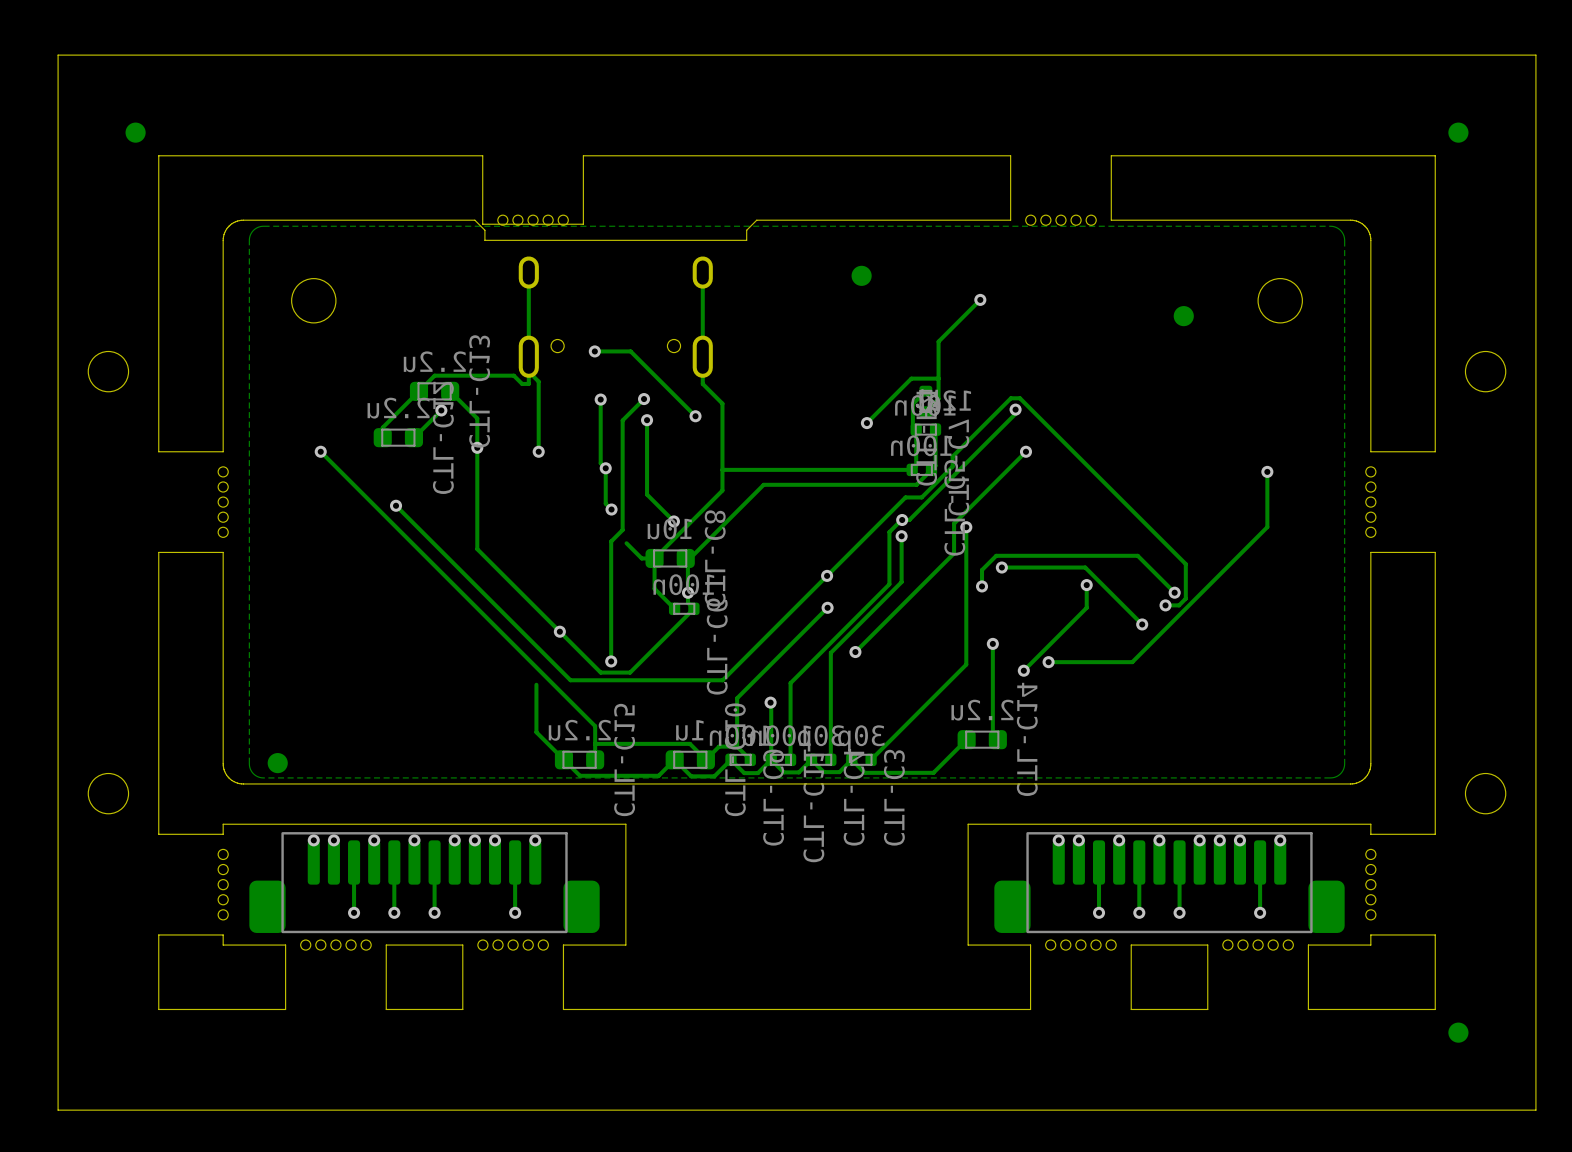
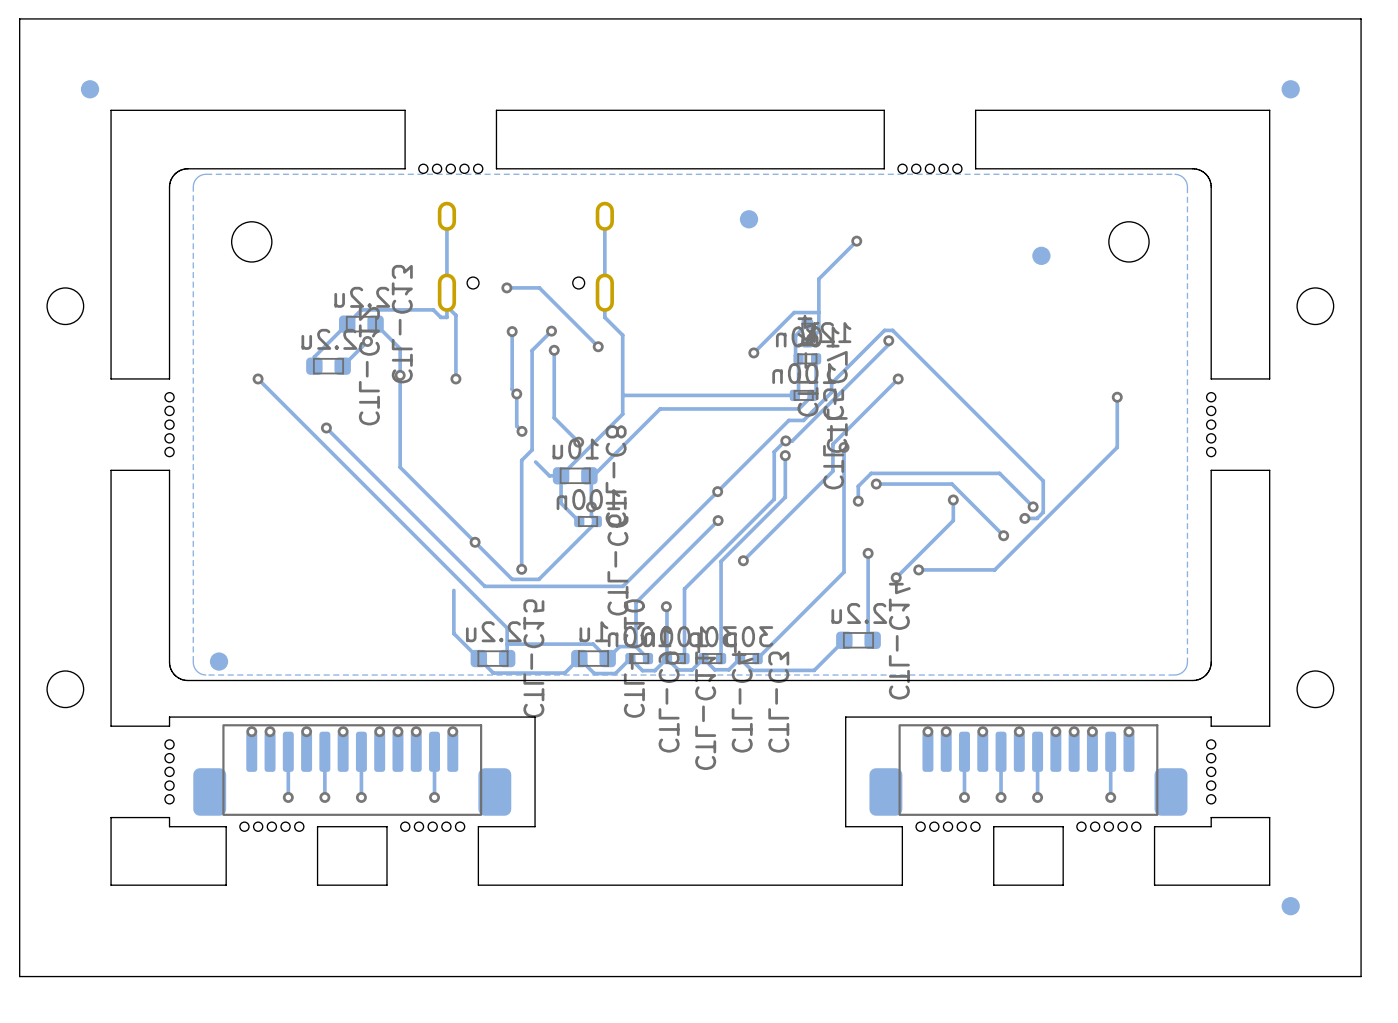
board edge: (583, 220) (583, 224) (482, 224) (482, 220) -> (397, 168) (405, 168)
board edge: (756, 220) (746, 230) (746, 240) (484, 240) (484, 230) (474, 220) -> (653, 168) (496, 168)

